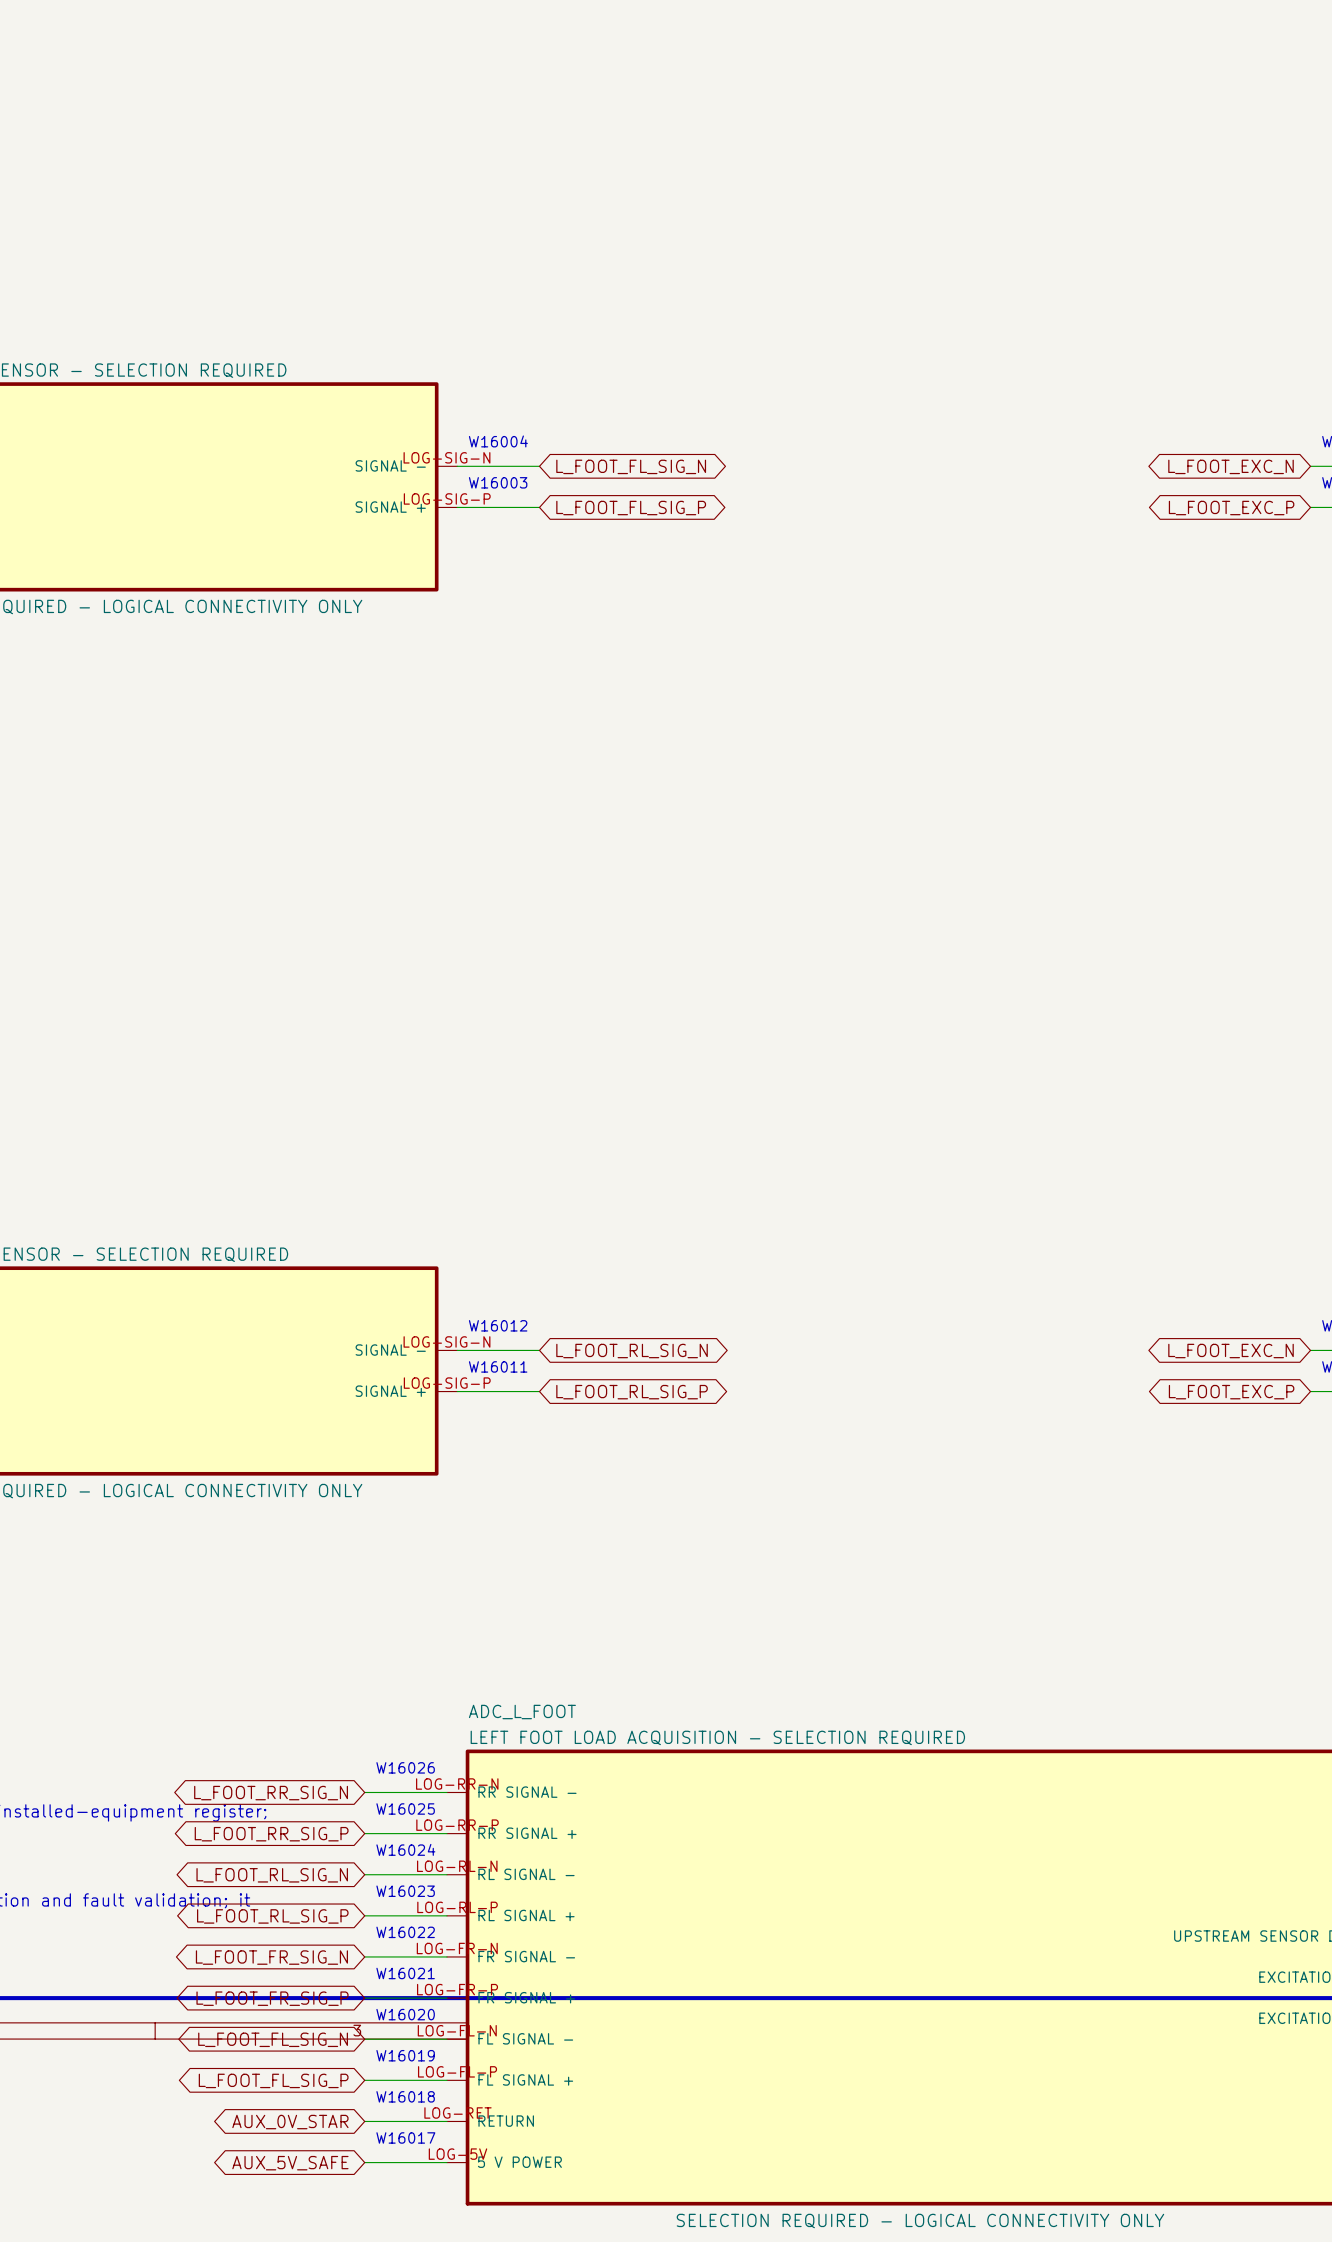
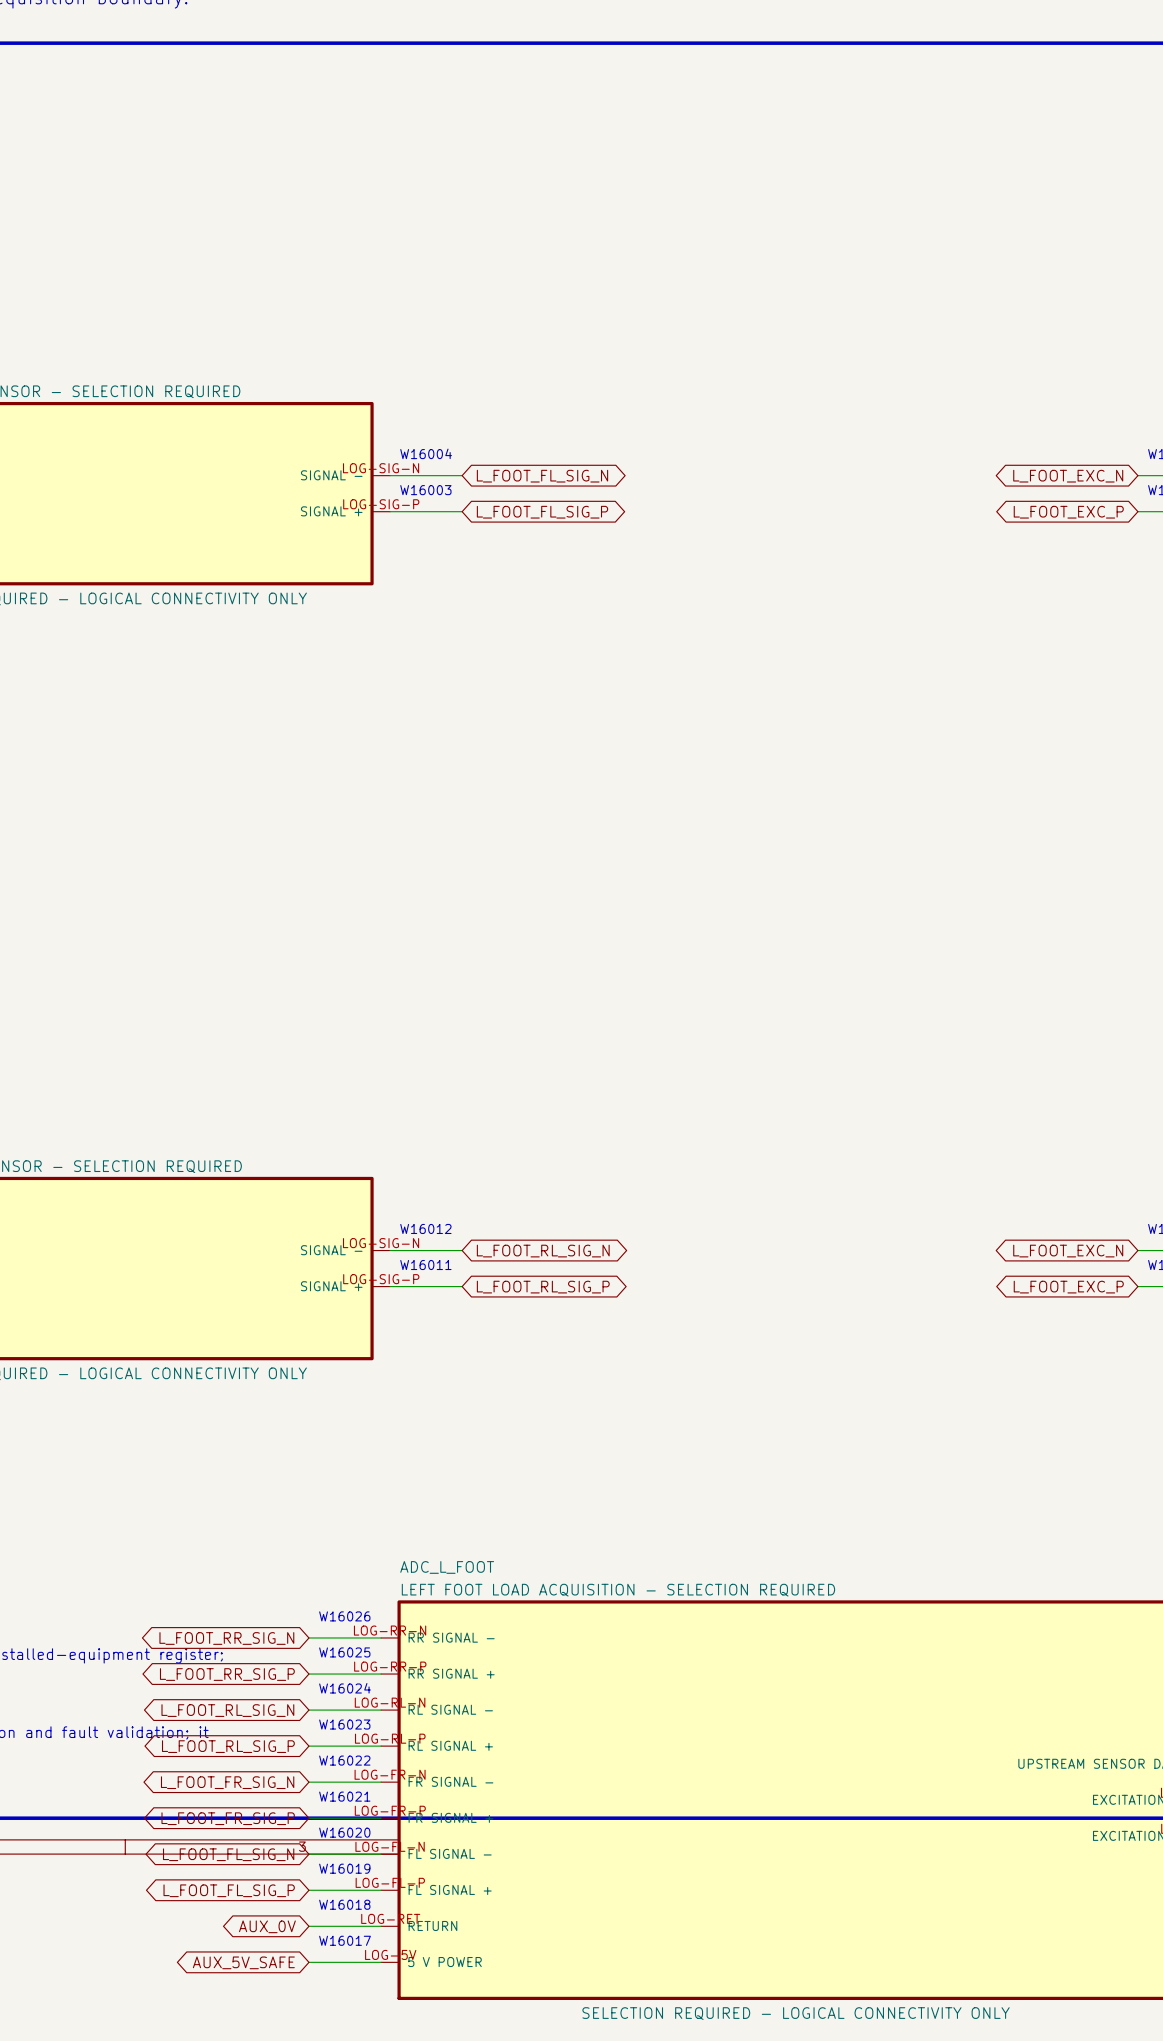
global label: AUX_0V_STAR (290, 2122) -> AUX_0V (267, 1926)

